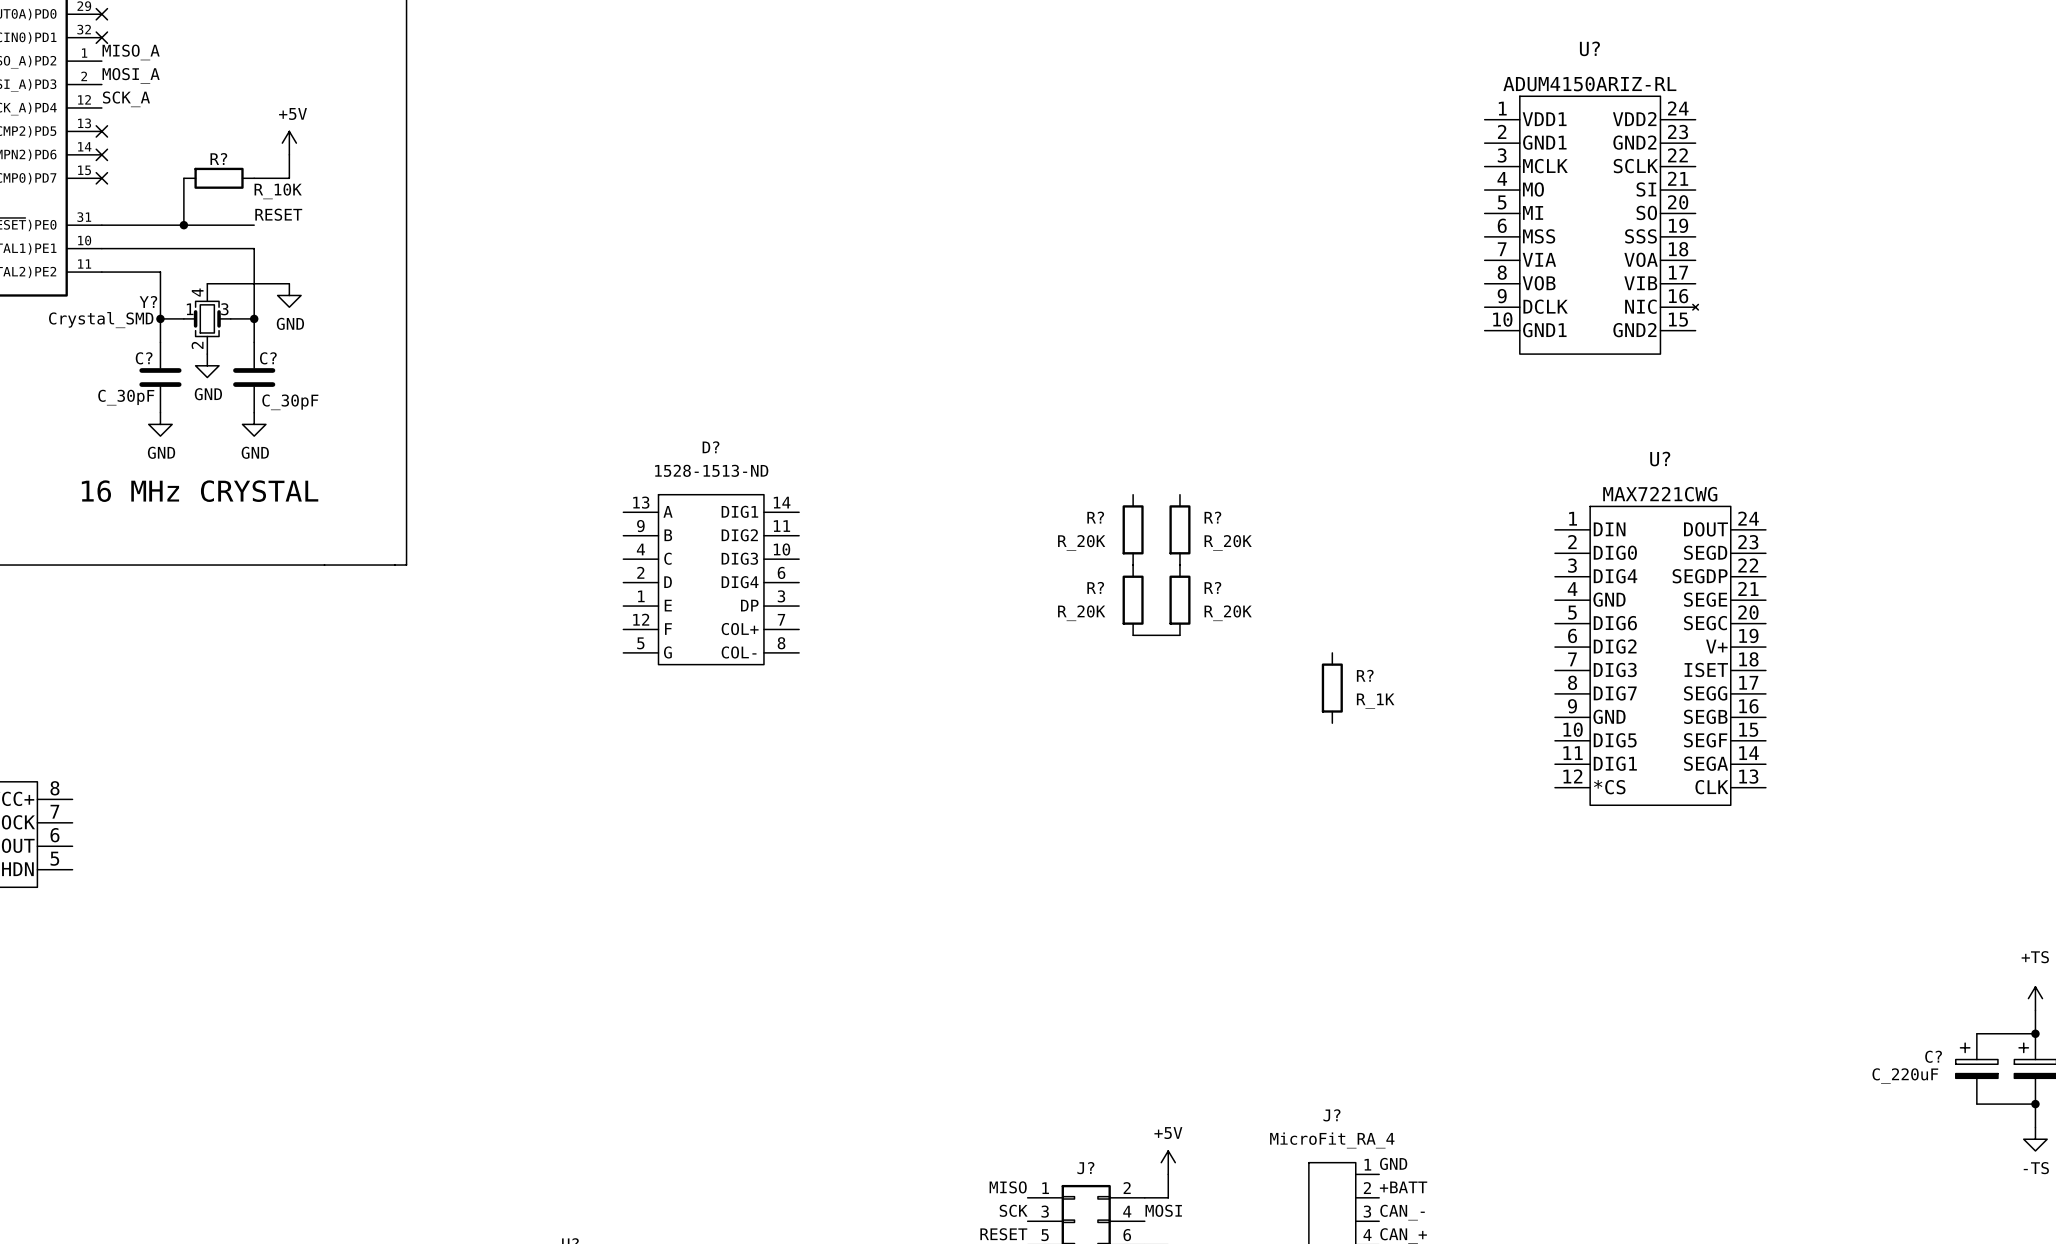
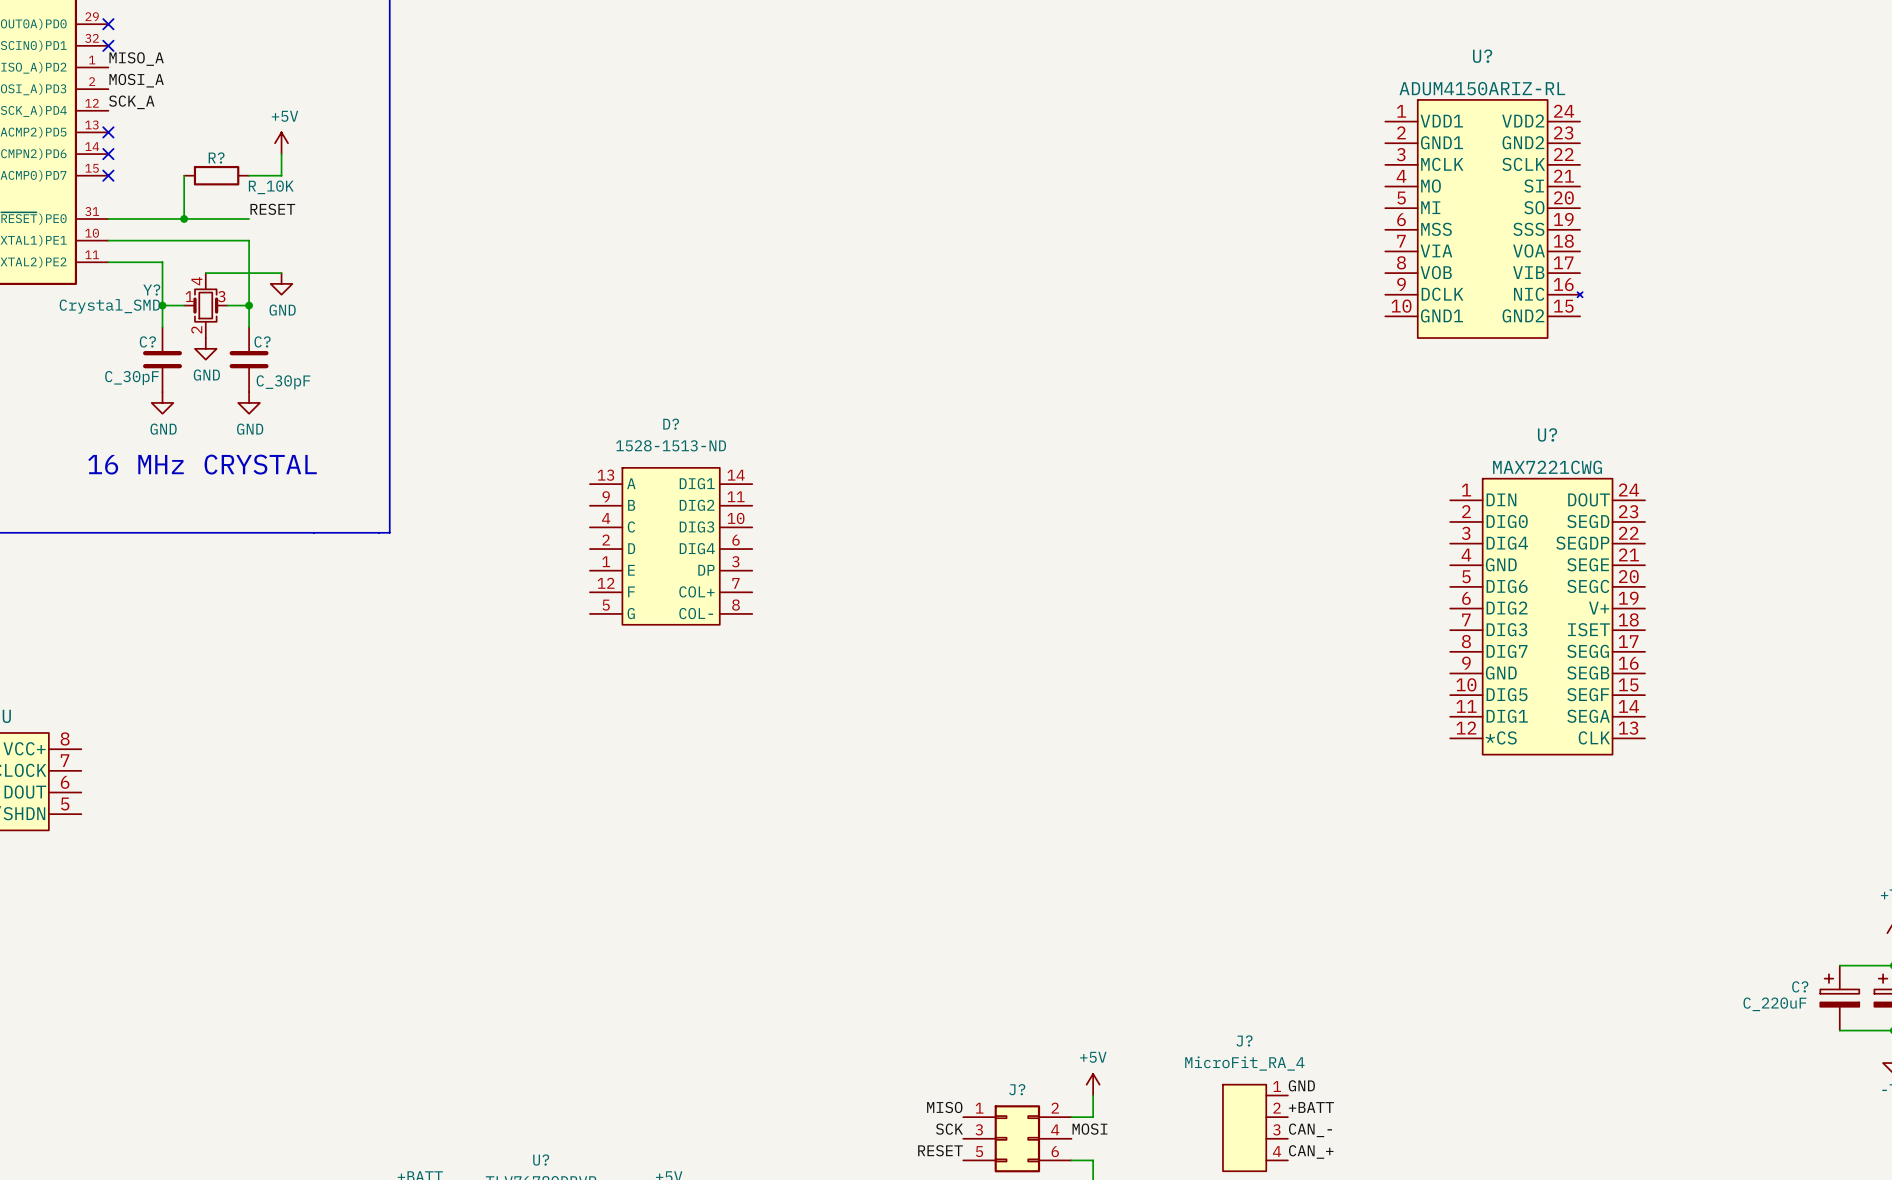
R?: R_20K (1133, 529) -> none
R?: R_20K (1179, 529) -> none
R?: R_20K (1133, 600) -> none
R?: R_20K (1179, 600) -> none
wire: (1133, 635) (1179, 635) -> none
R?: R_1K (1332, 688) -> none

